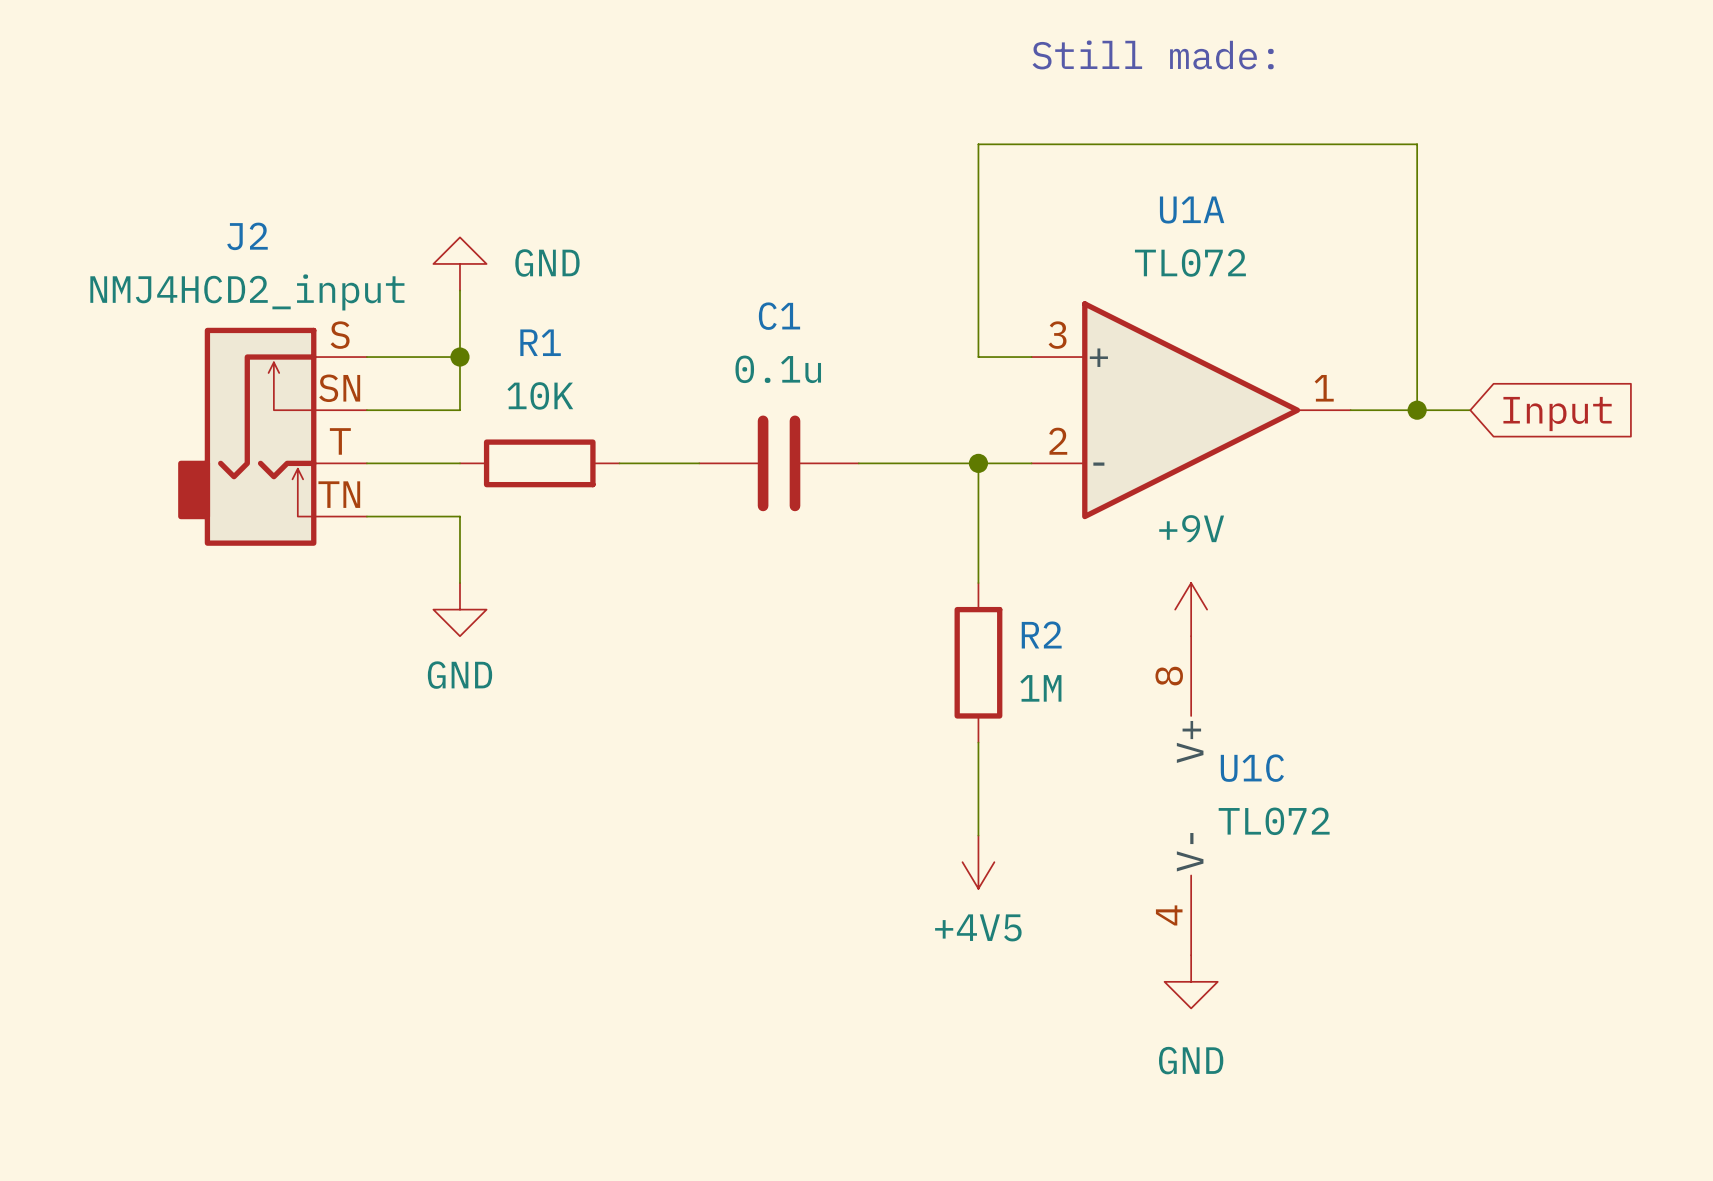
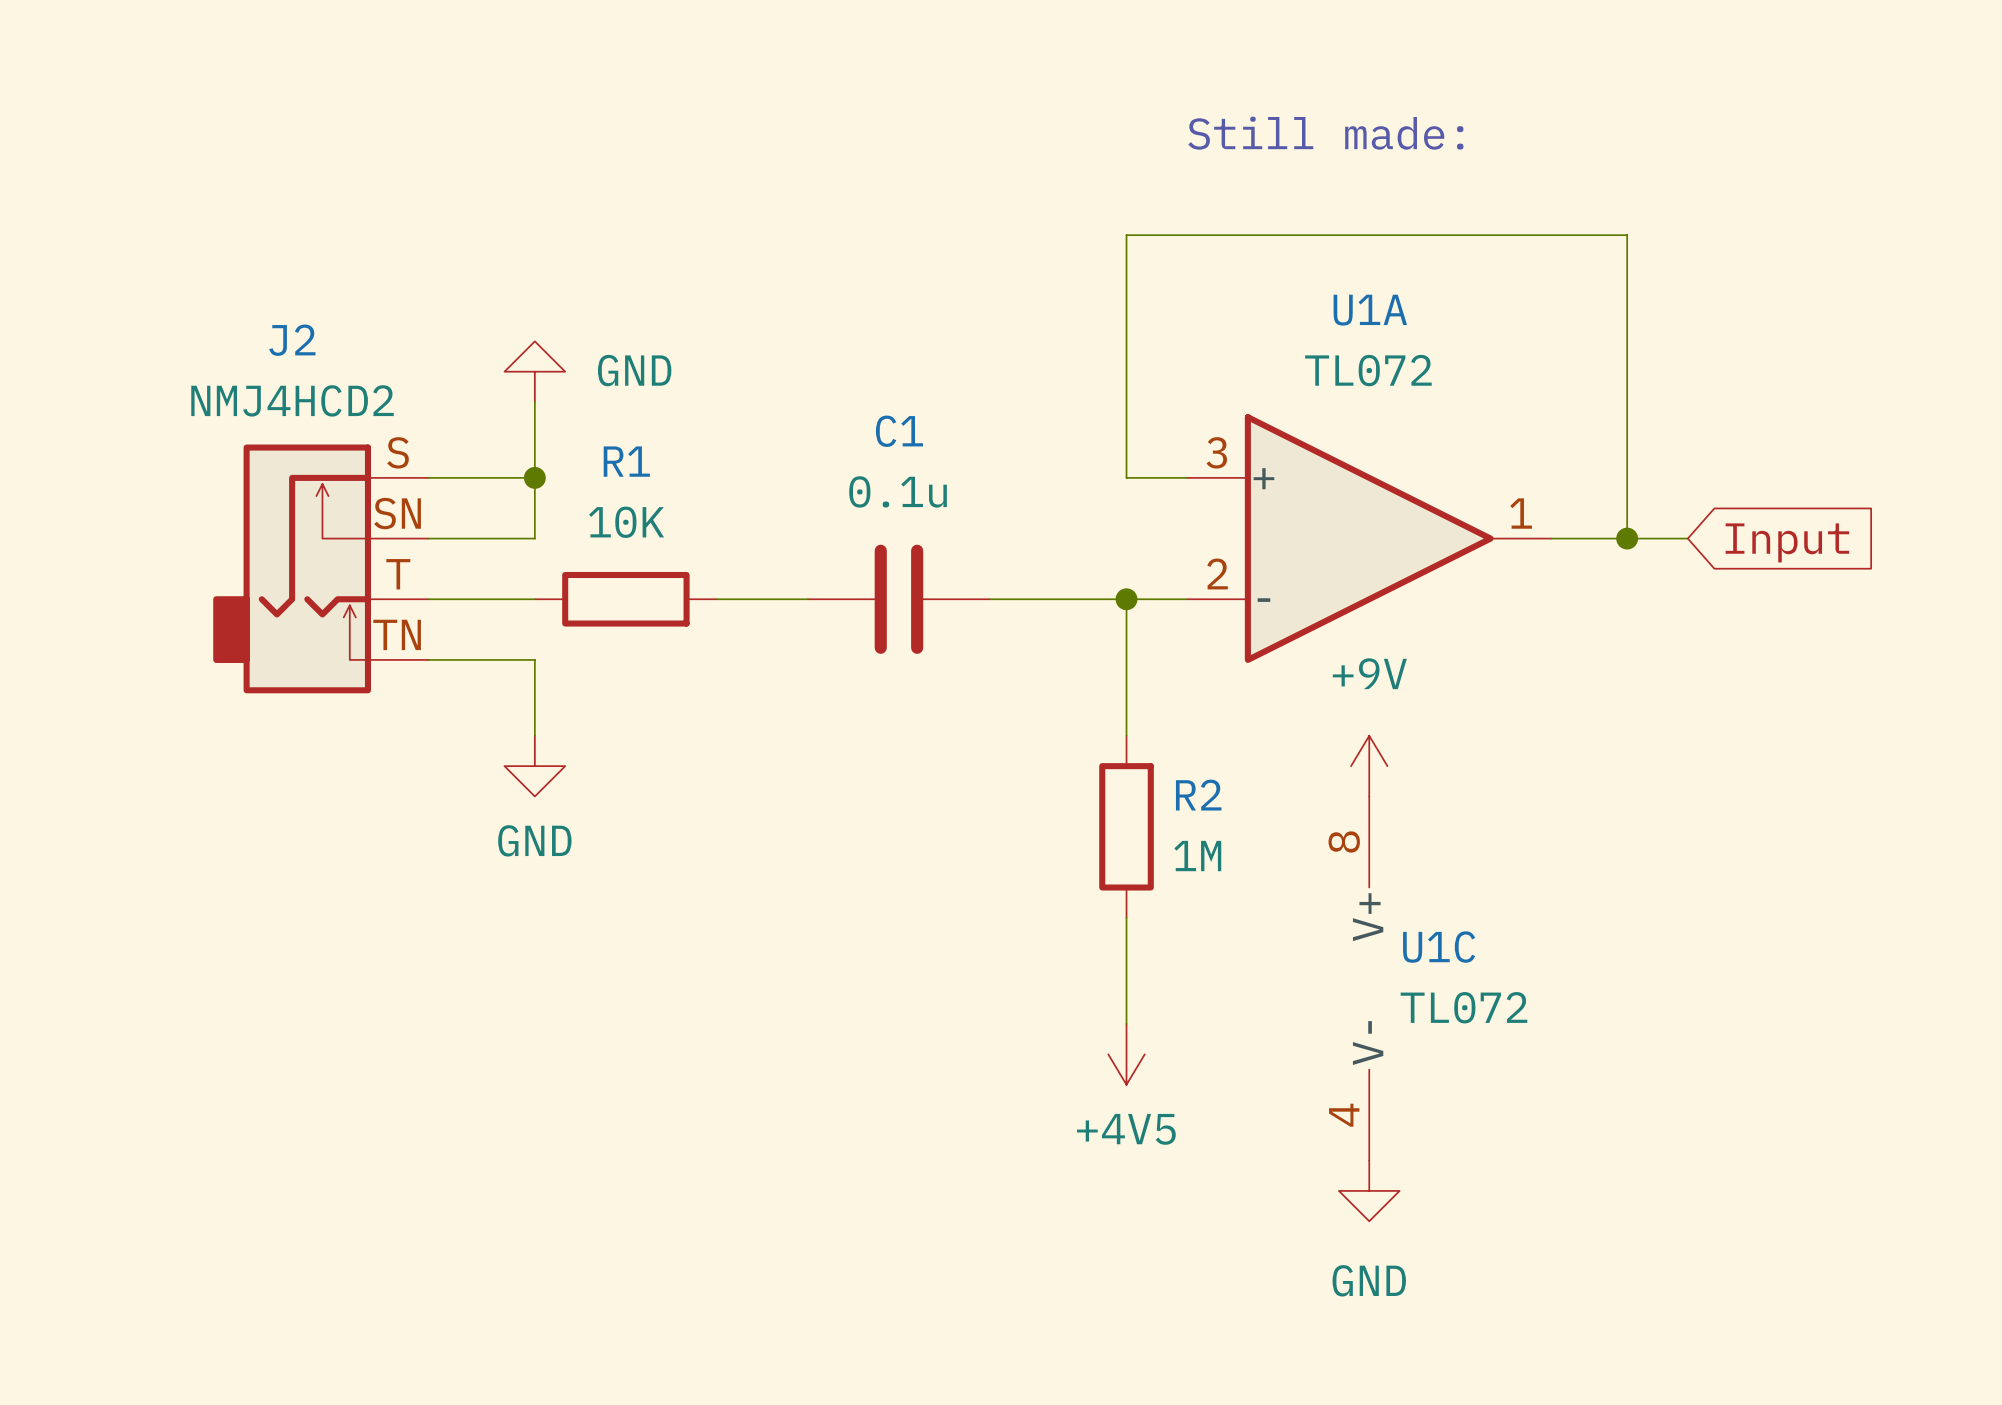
J2 value: NMJ4HCD2_input (247, 292) -> NMJ4HCD2 (292, 400)

